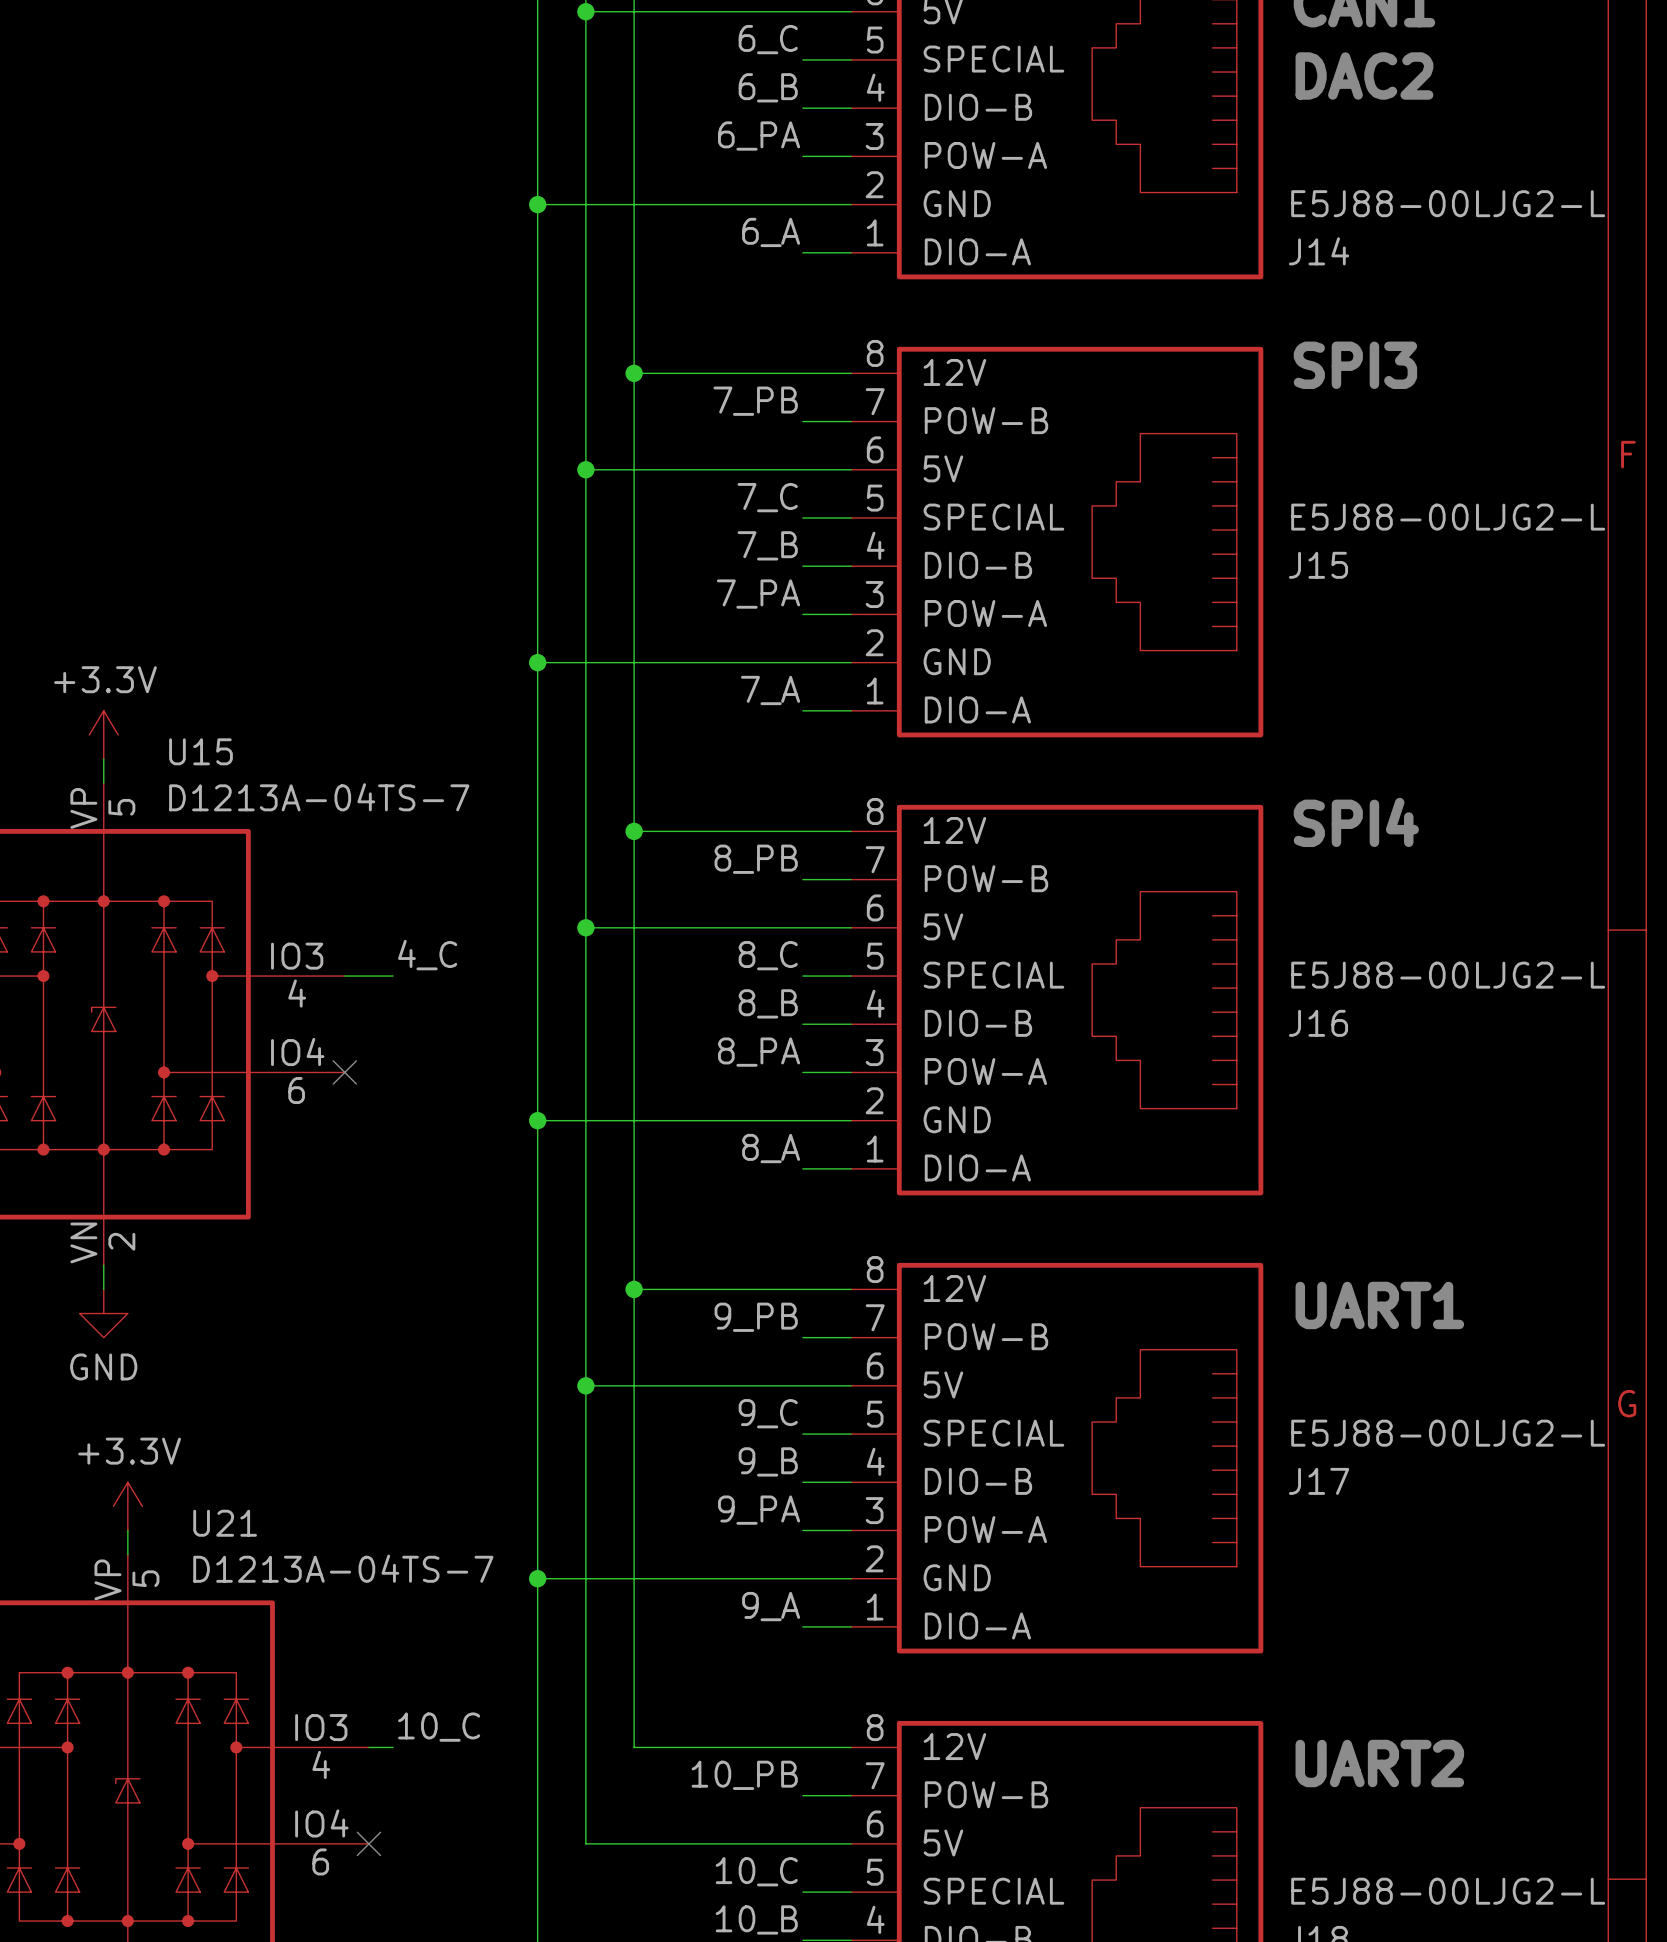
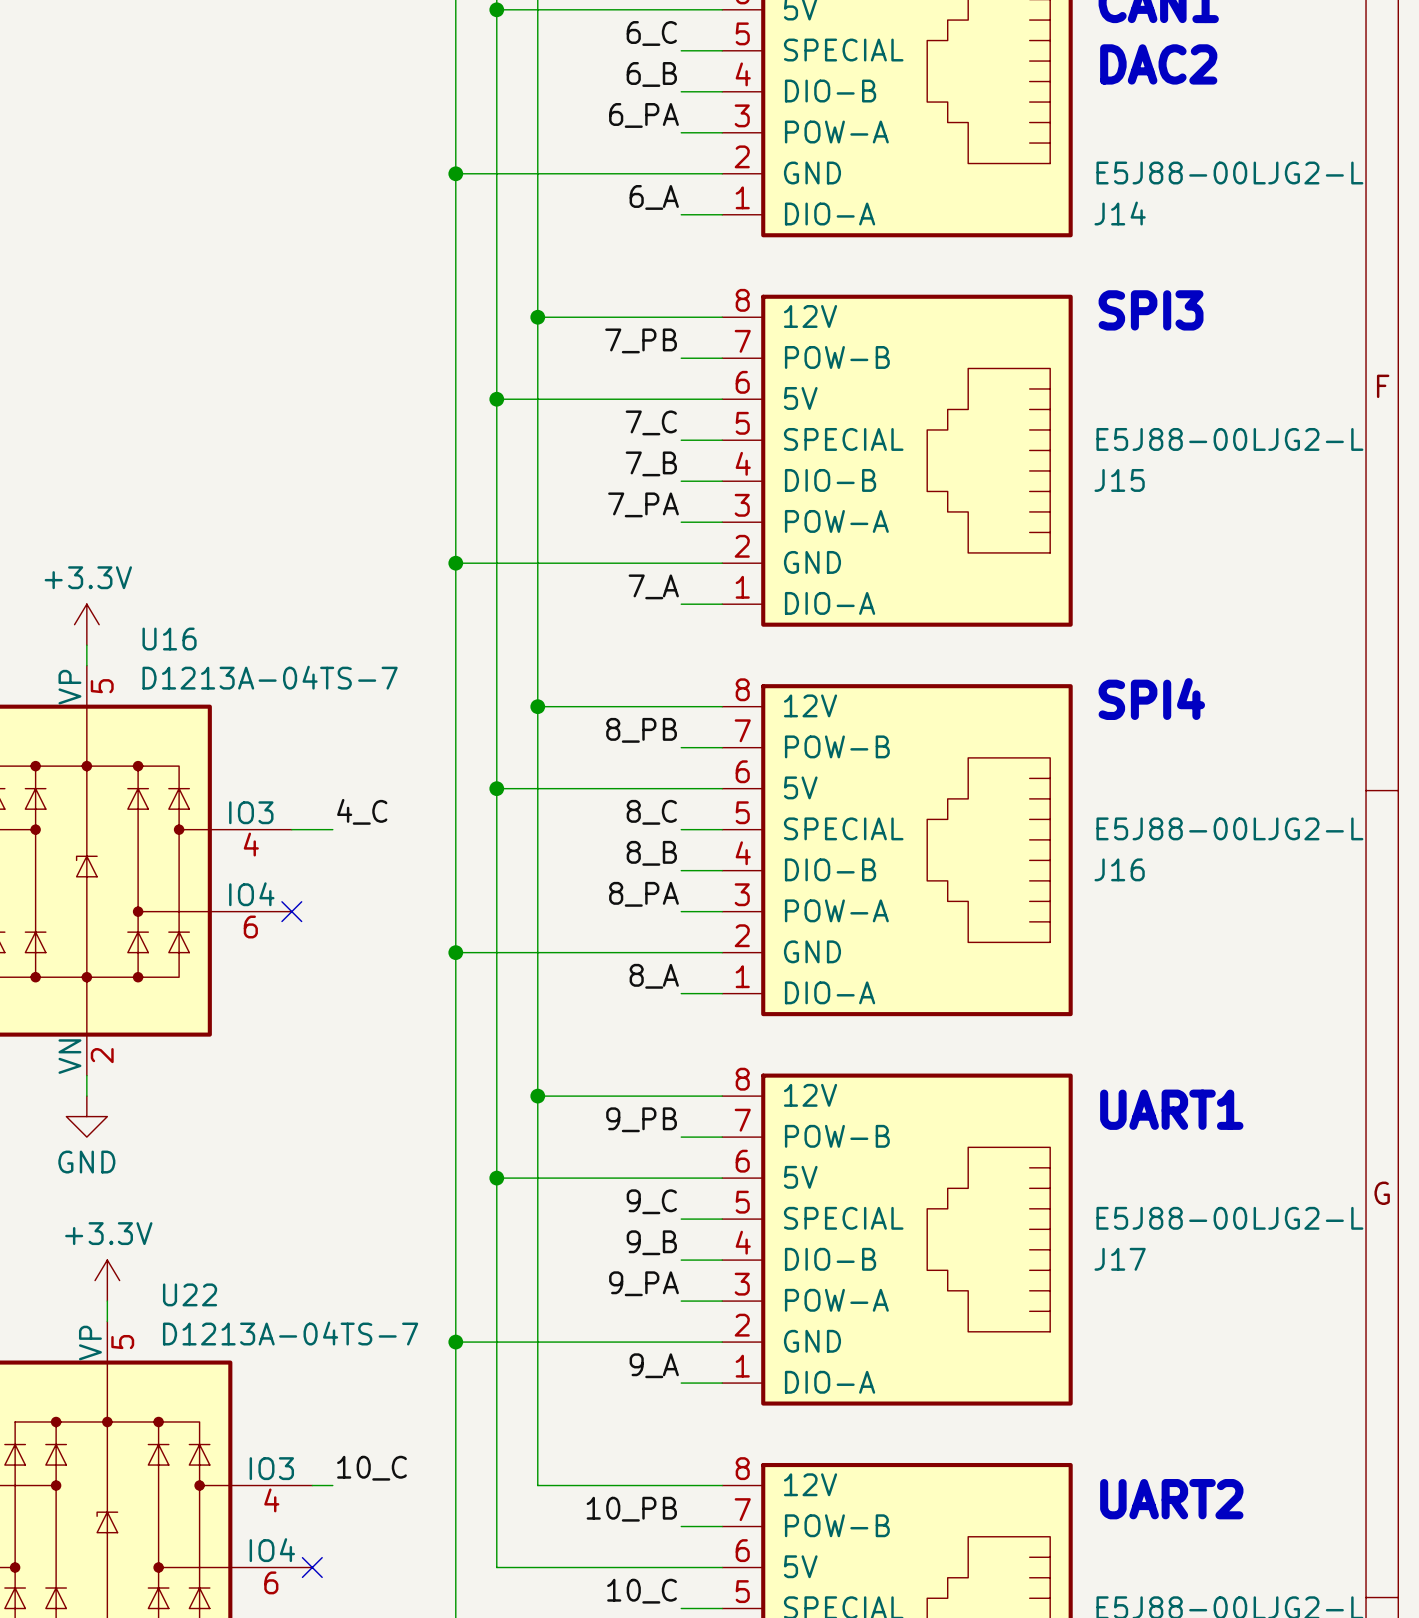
U15 name: U15 (201, 751) -> U16 (169, 639)
U21 name: U21 (225, 1523) -> U22 (190, 1294)

